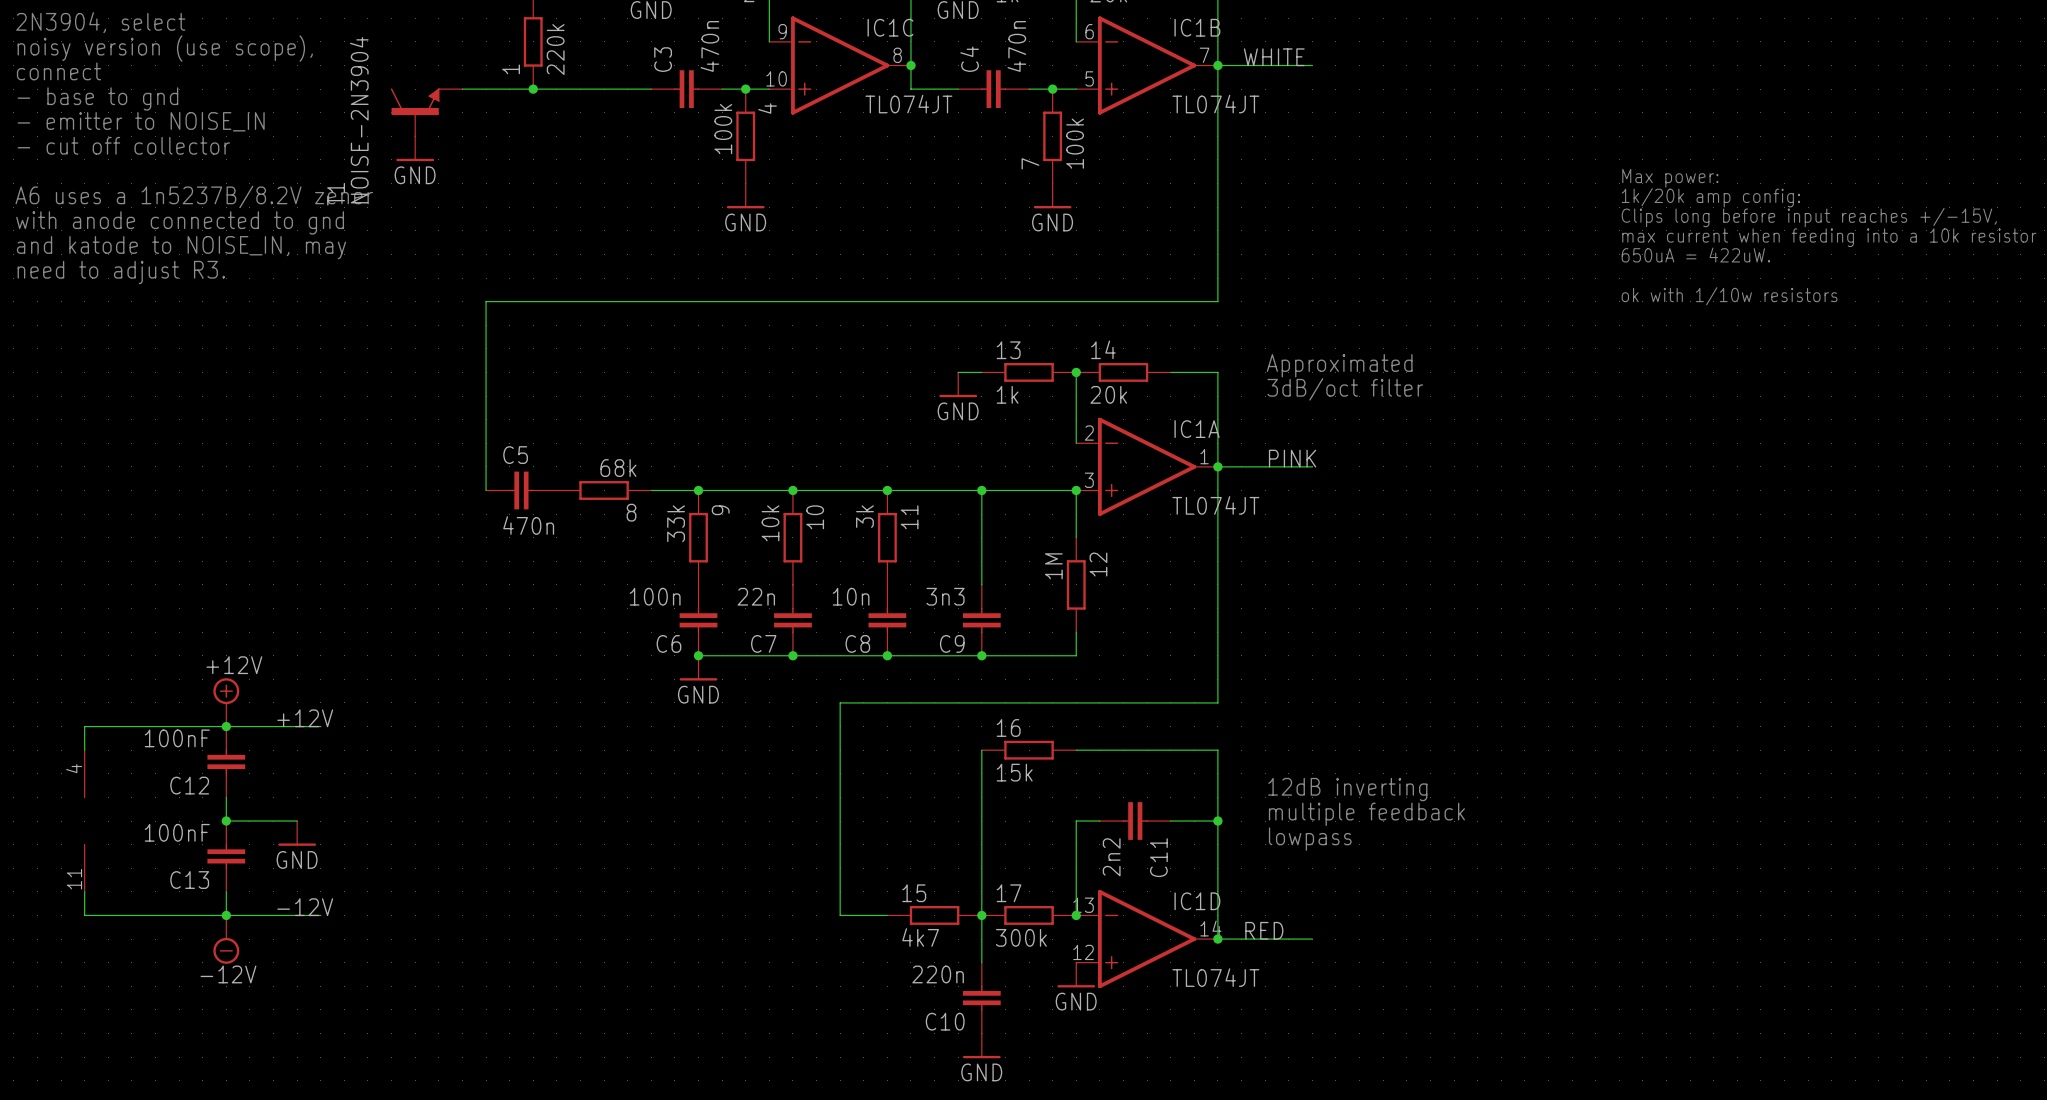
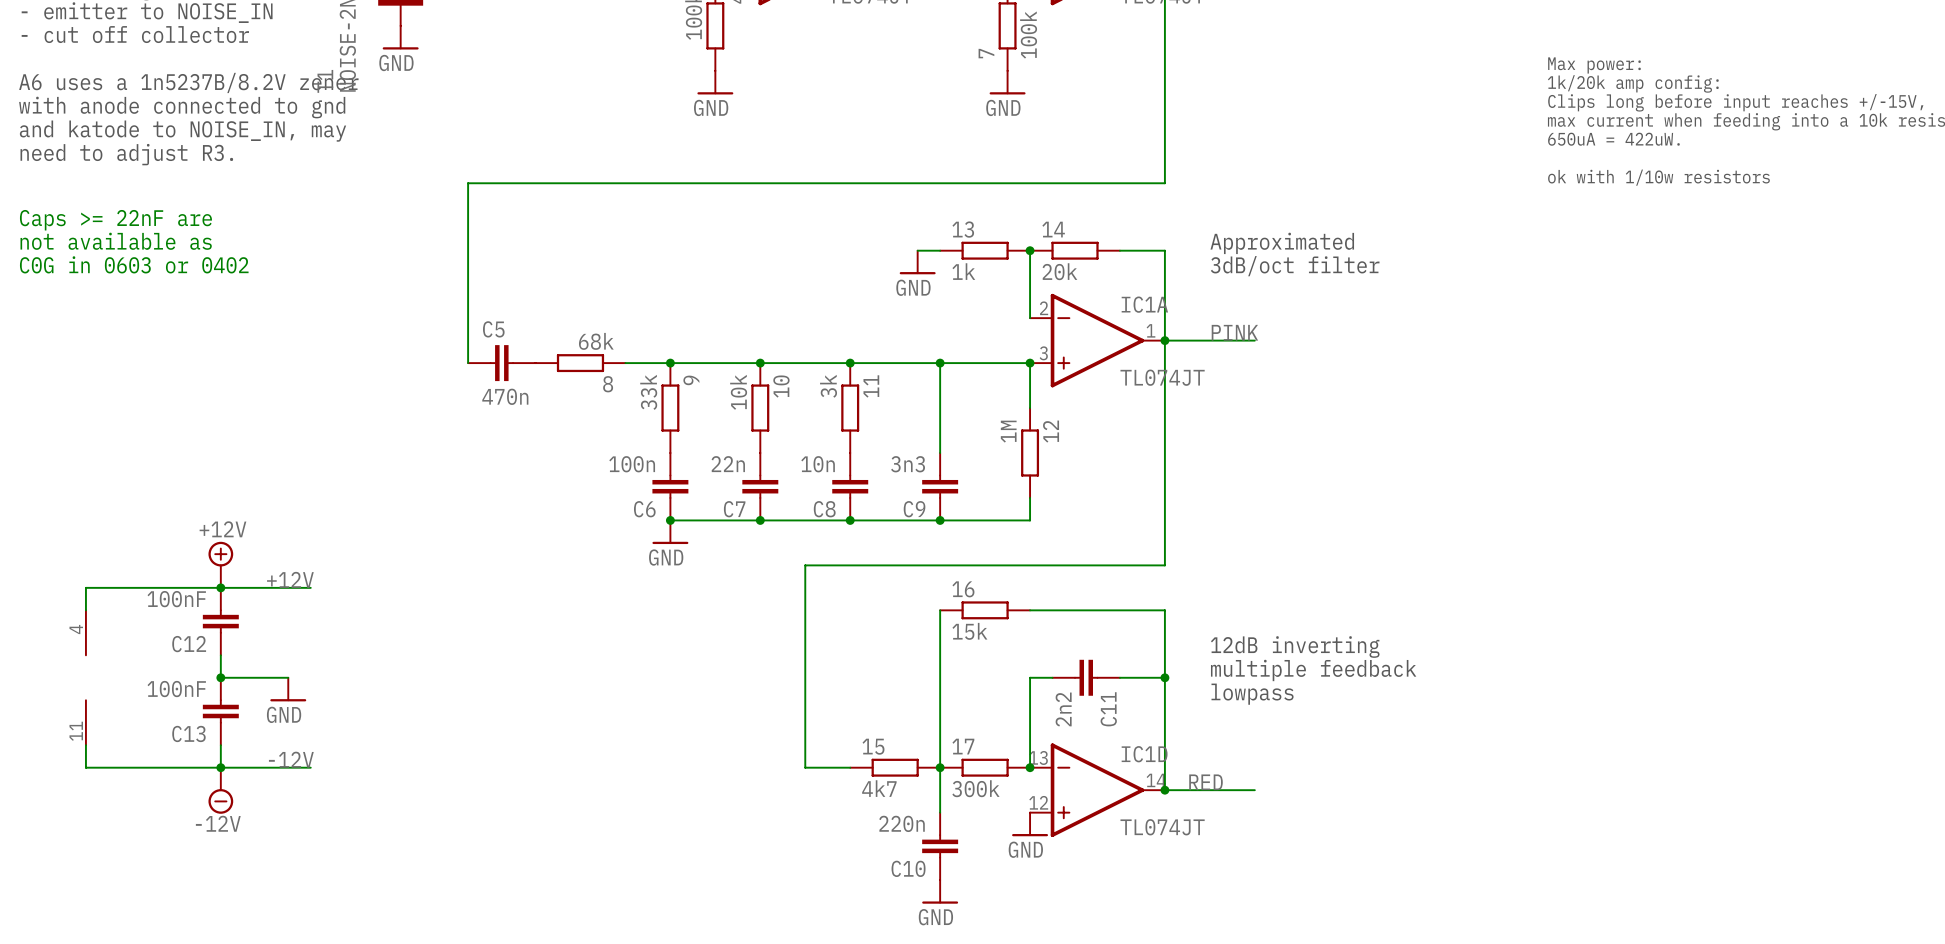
text: none -> Caps >= 22nF are (115, 220)
text: none -> not available as (116, 241)
text: none -> C0G in 0603 or 0402 (134, 264)

